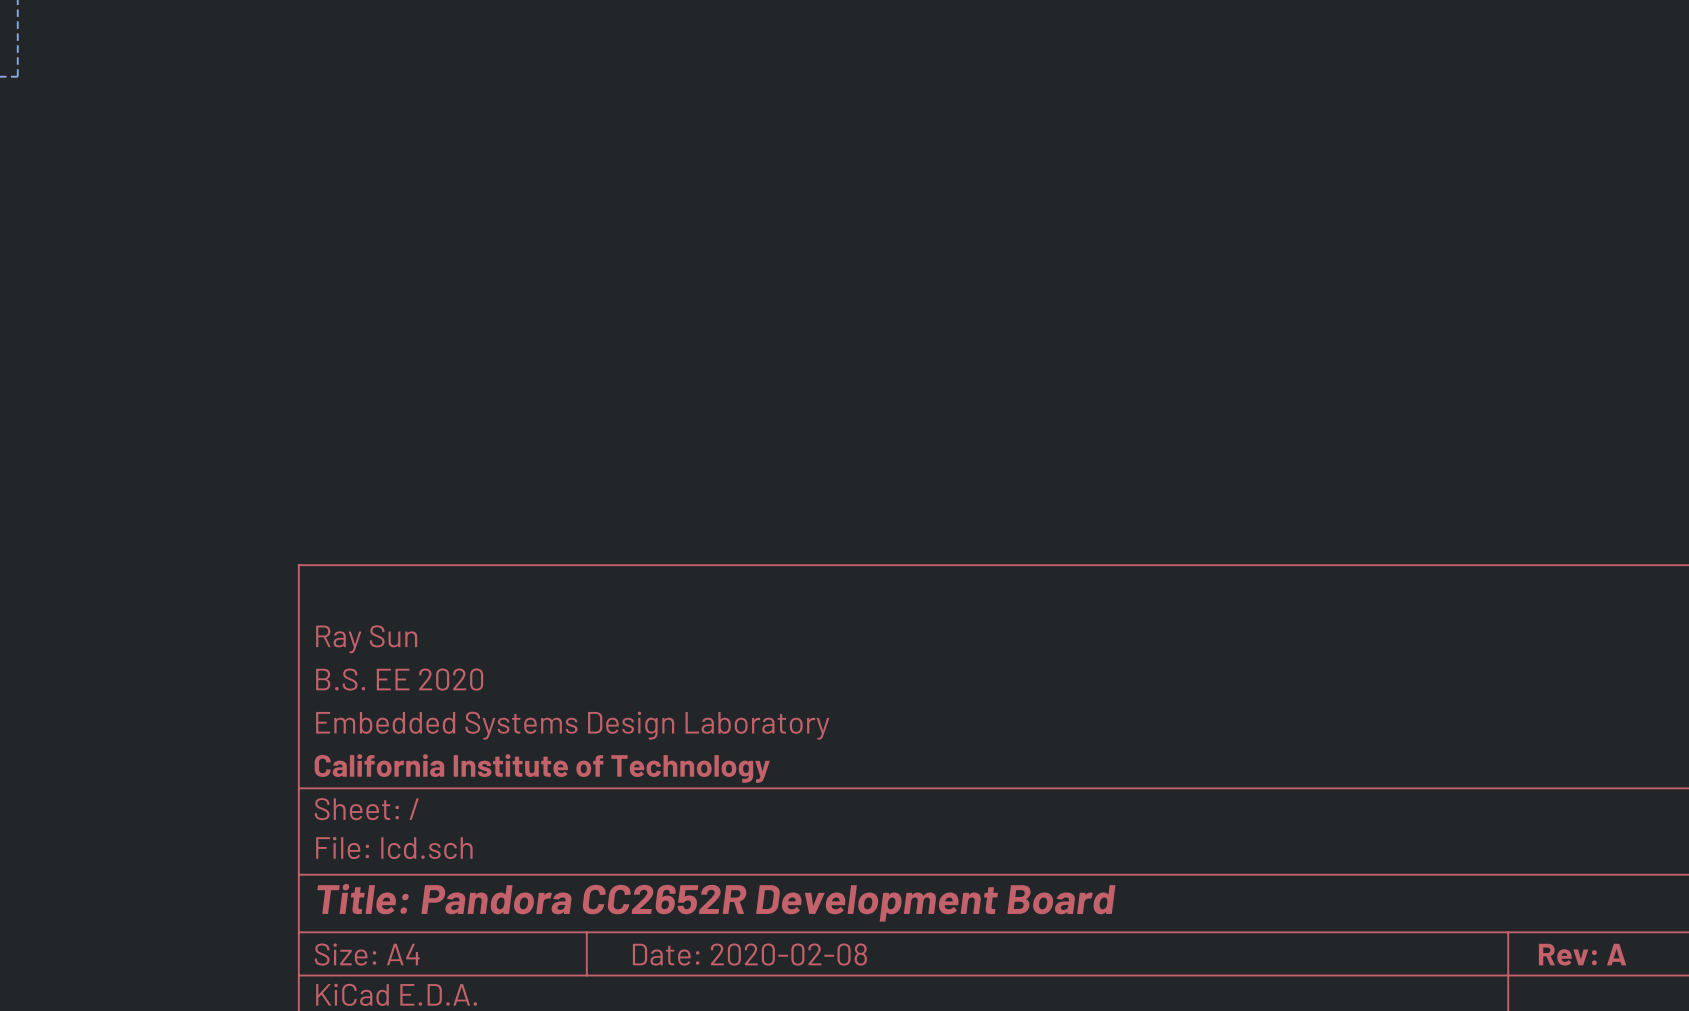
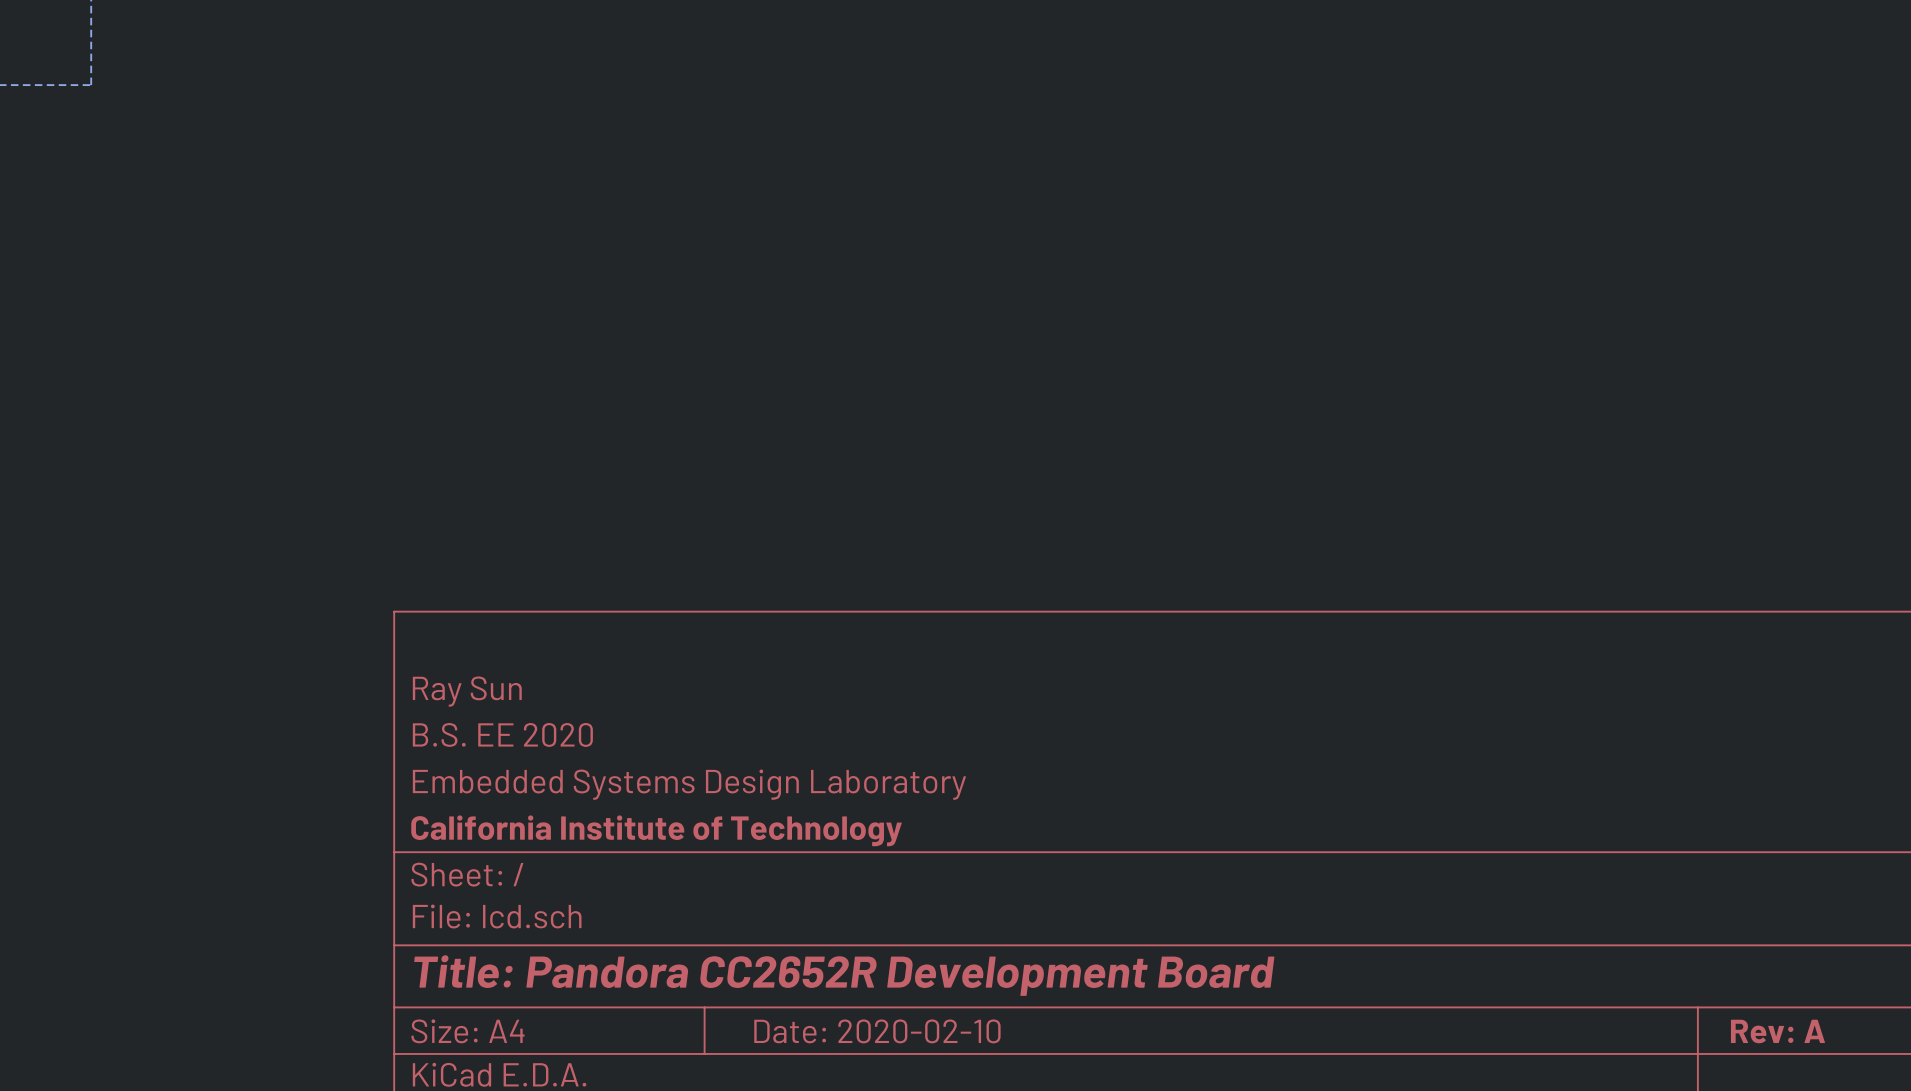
title block: Date: 2020-02-08 (749, 954) -> Date: 2020-02-10 (877, 1031)

